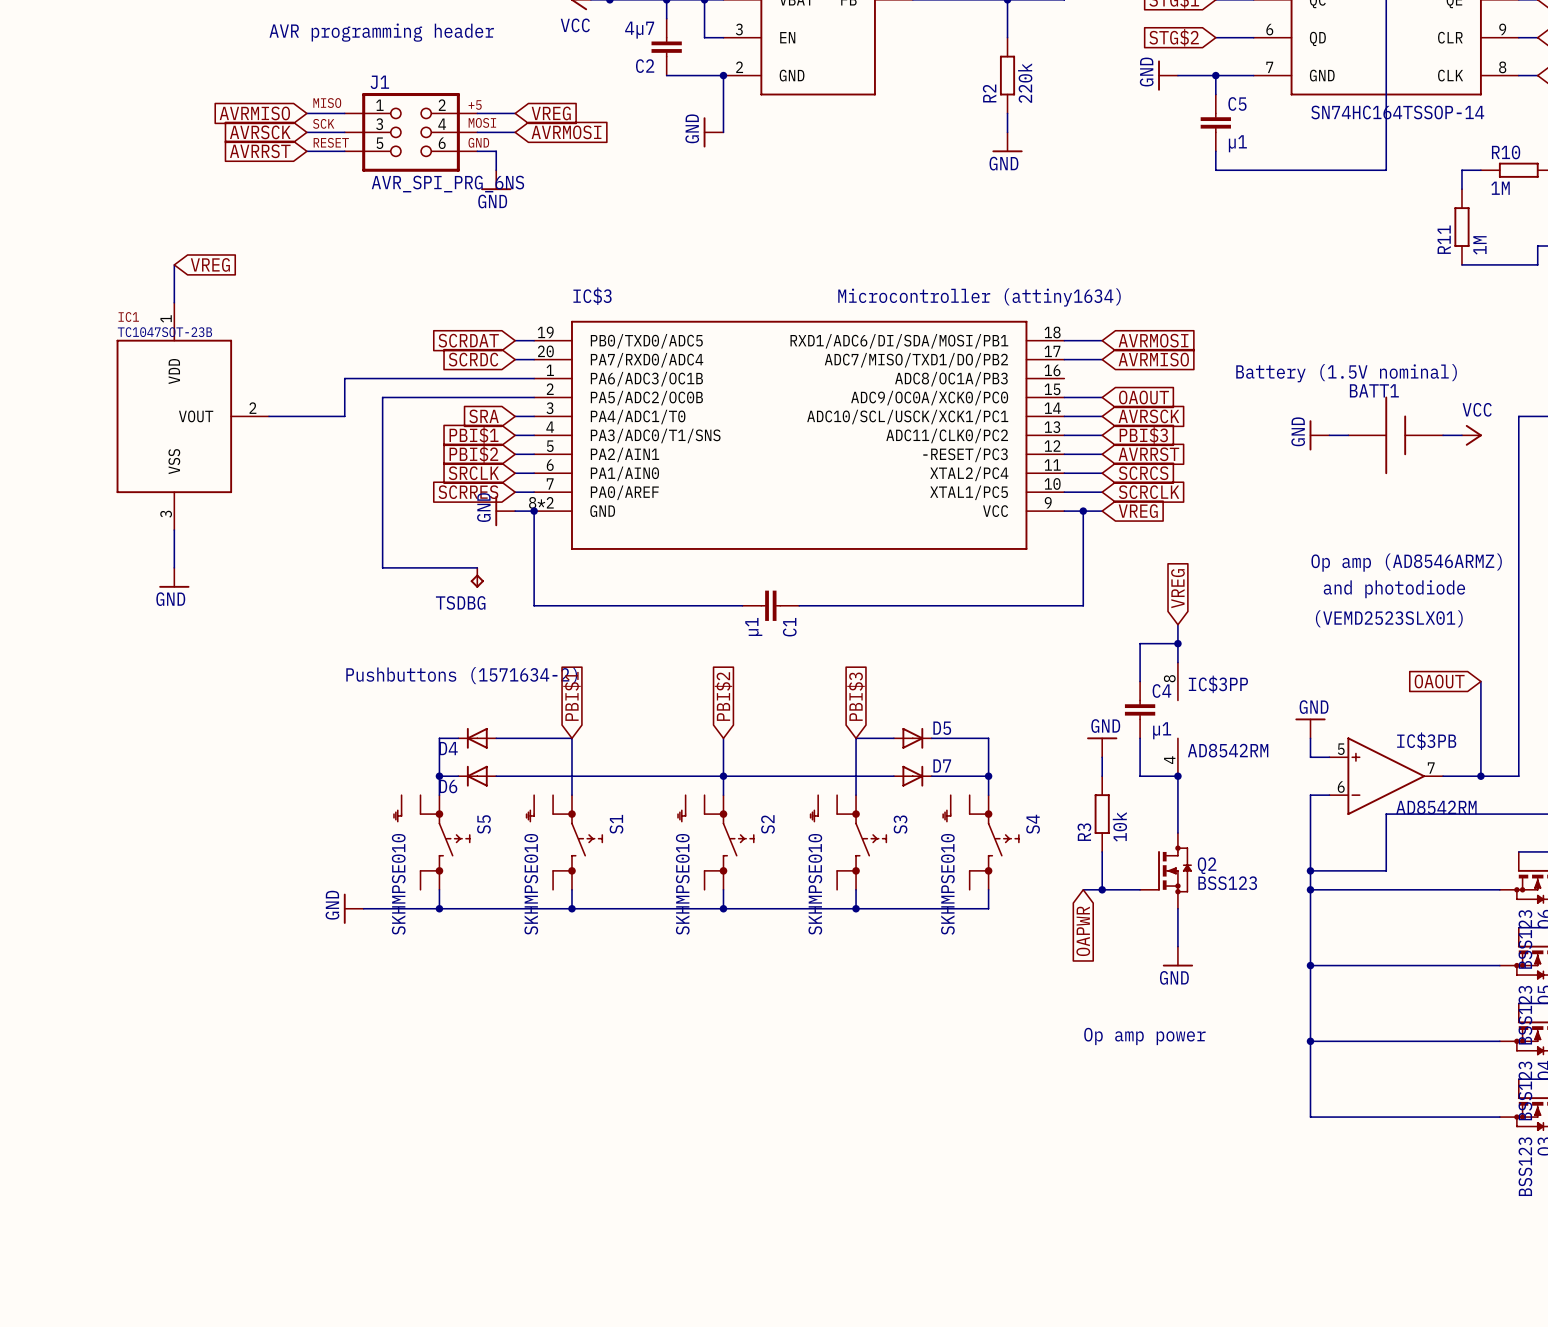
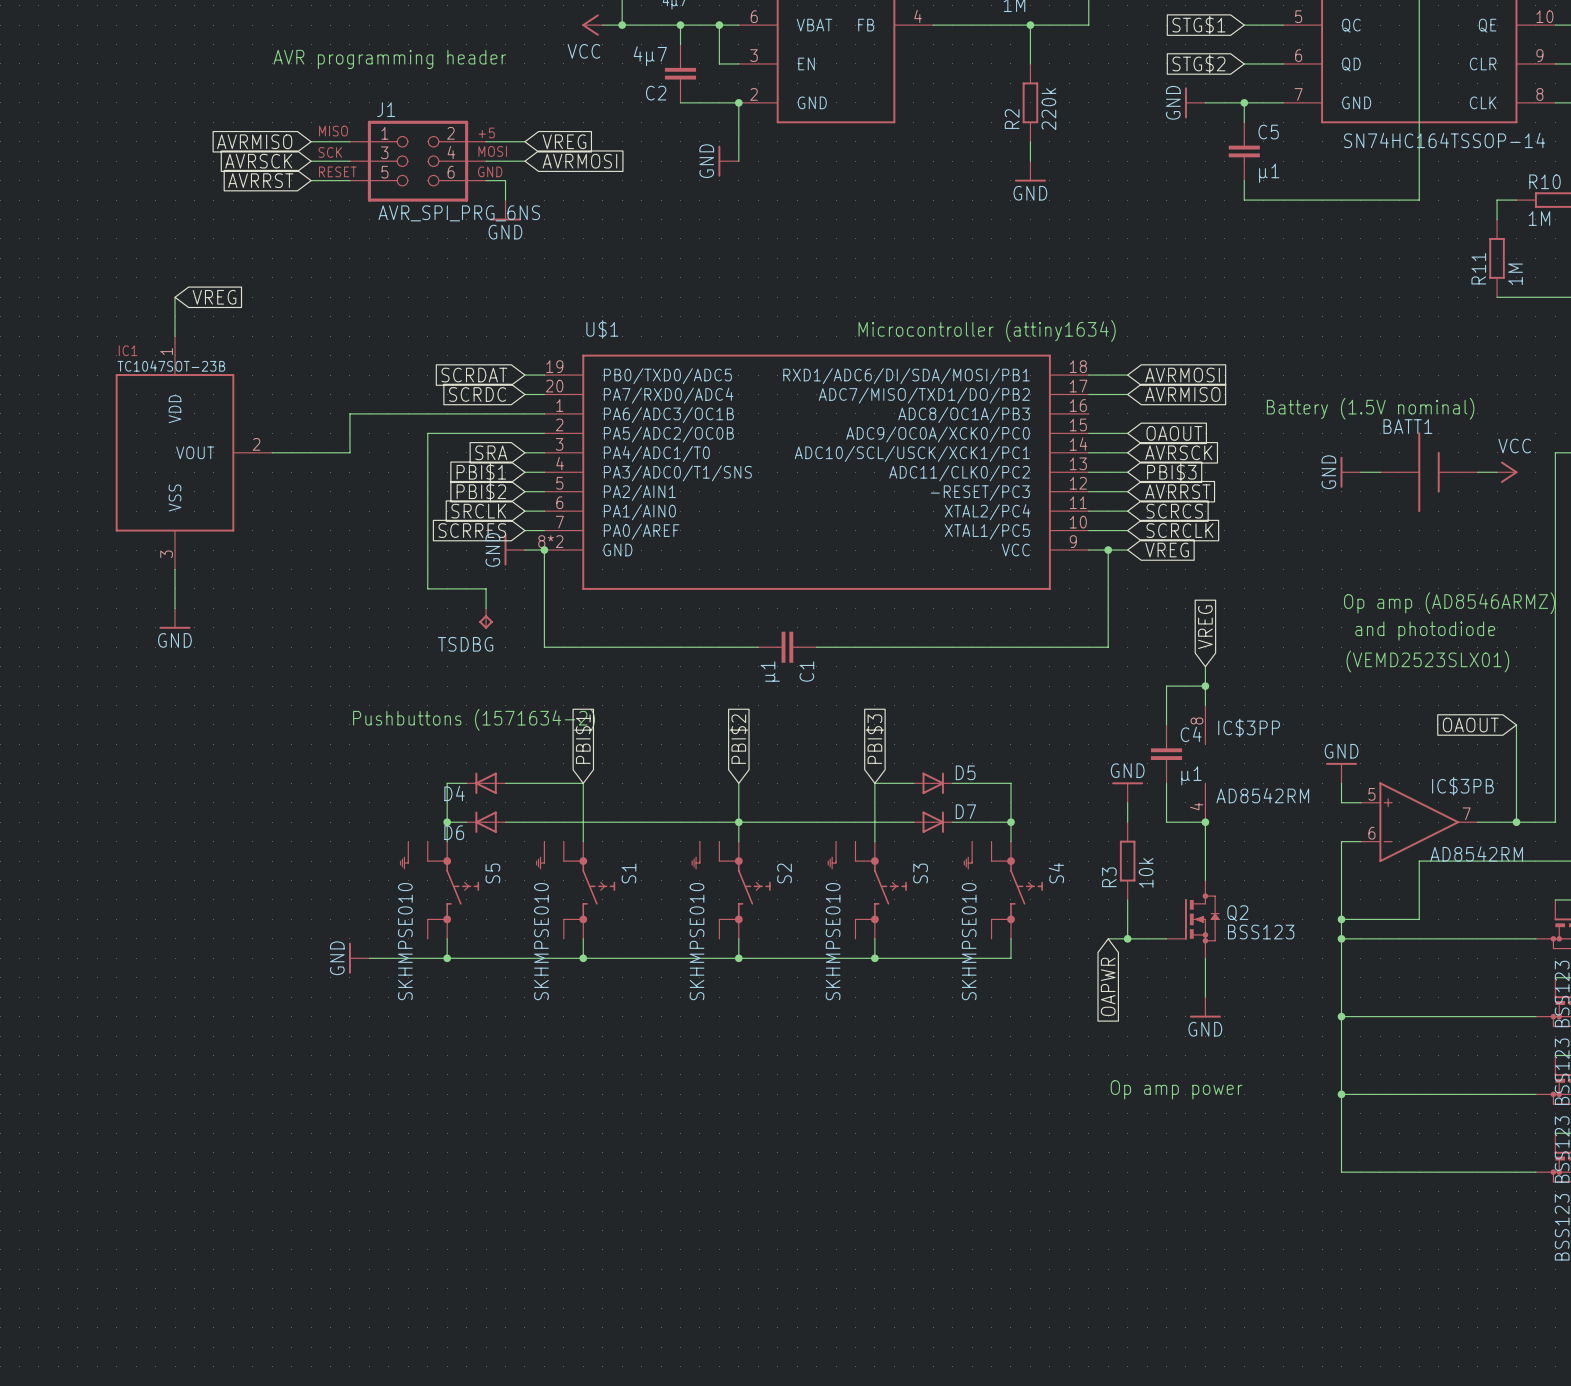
IC$3 name: IC$3 (592, 296) -> U$1 (602, 329)
wire: (420, 397) (382, 397) (382, 567) (477, 567) -> (427, 433) (427, 588) (486, 588) (486, 608)

